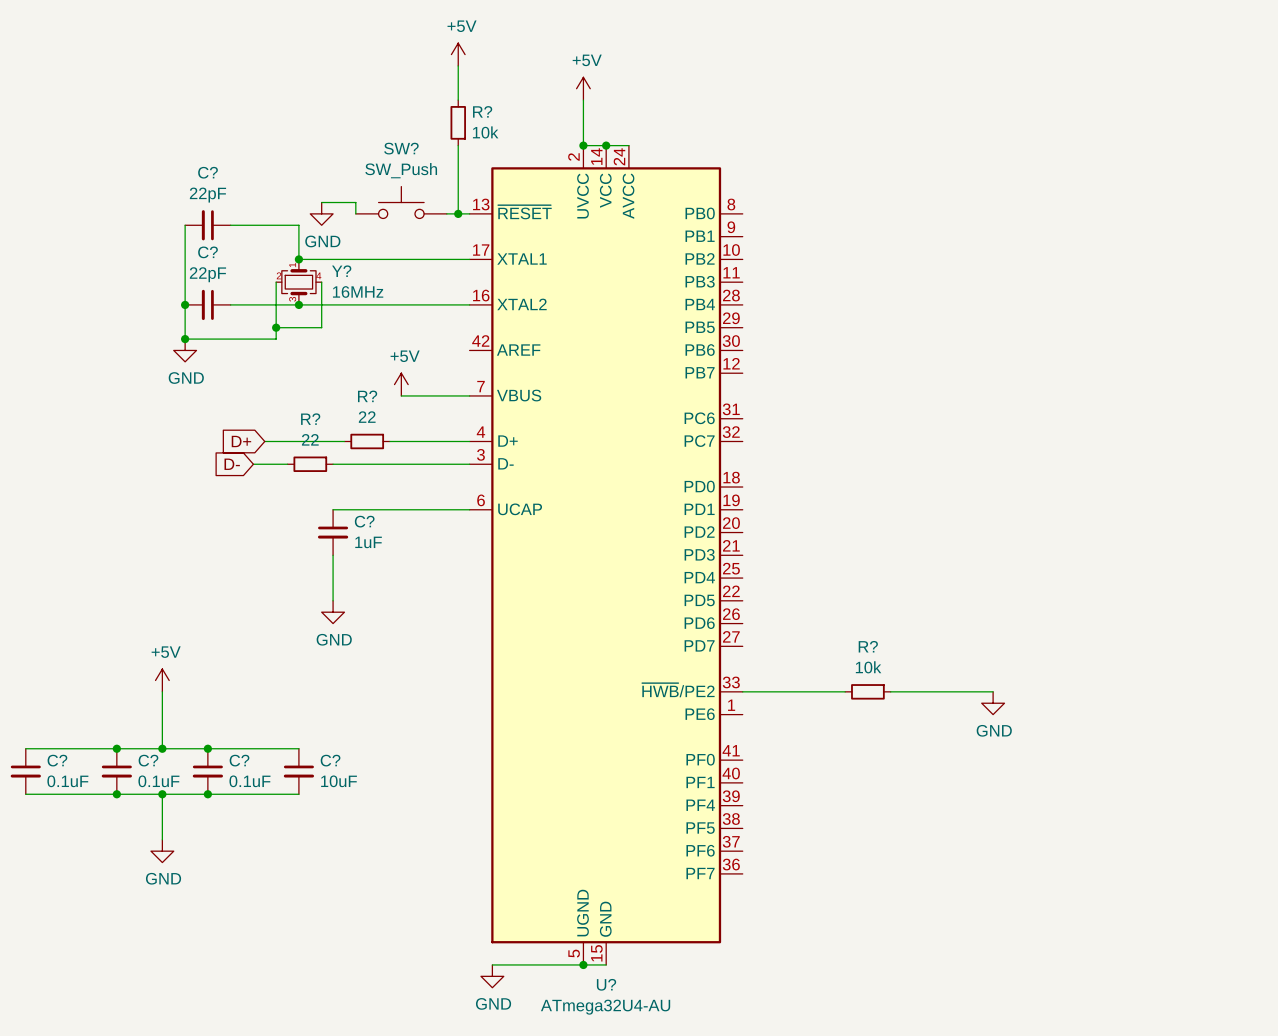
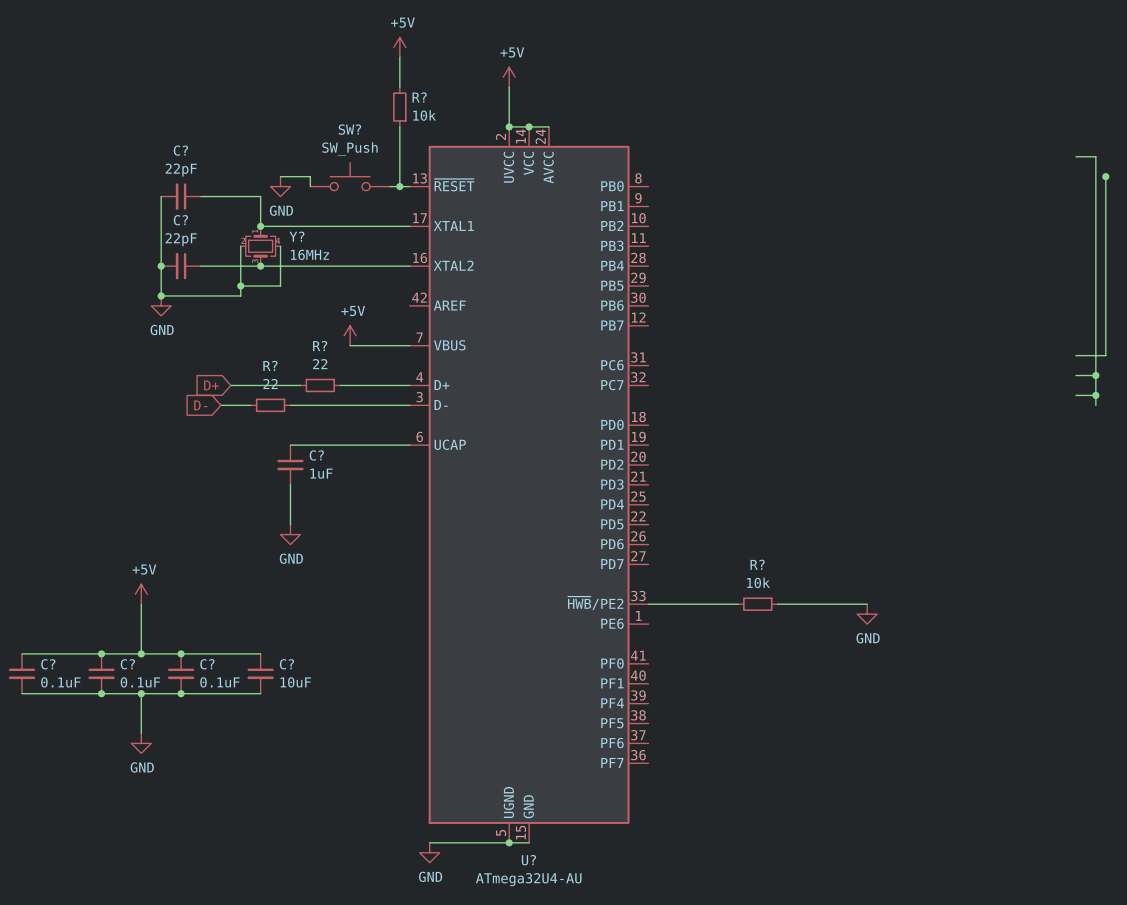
wire: none -> (1075, 156) (1095, 156) (1095, 405)
wire: none -> (1105, 176) (1105, 355) (1075, 355)
junction: none -> (1105, 176)
wire: none -> (1075, 375) (1095, 375)
junction: none -> (1095, 375)
wire: none -> (1075, 395) (1095, 395)
junction: none -> (1095, 395)

